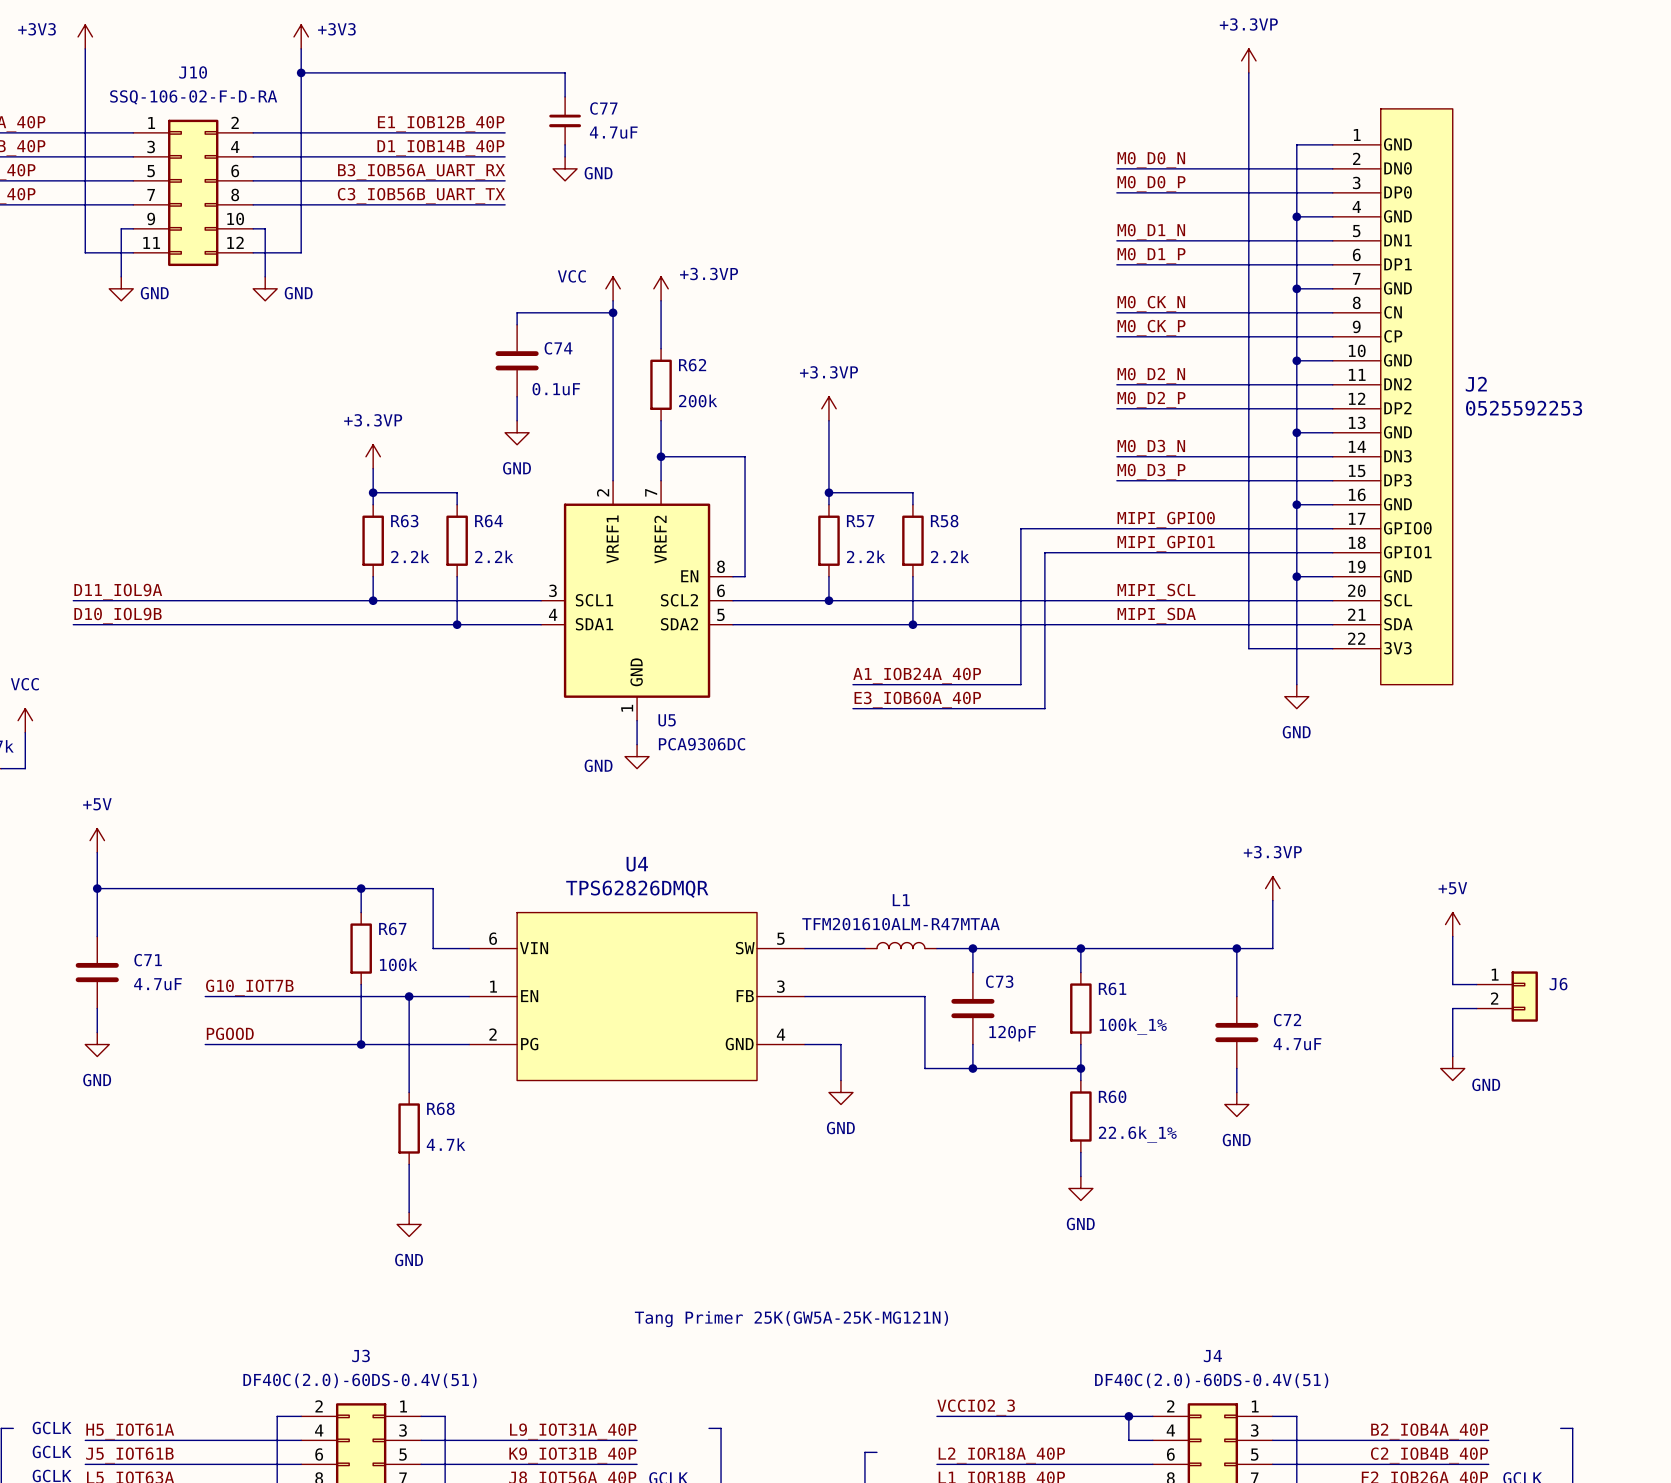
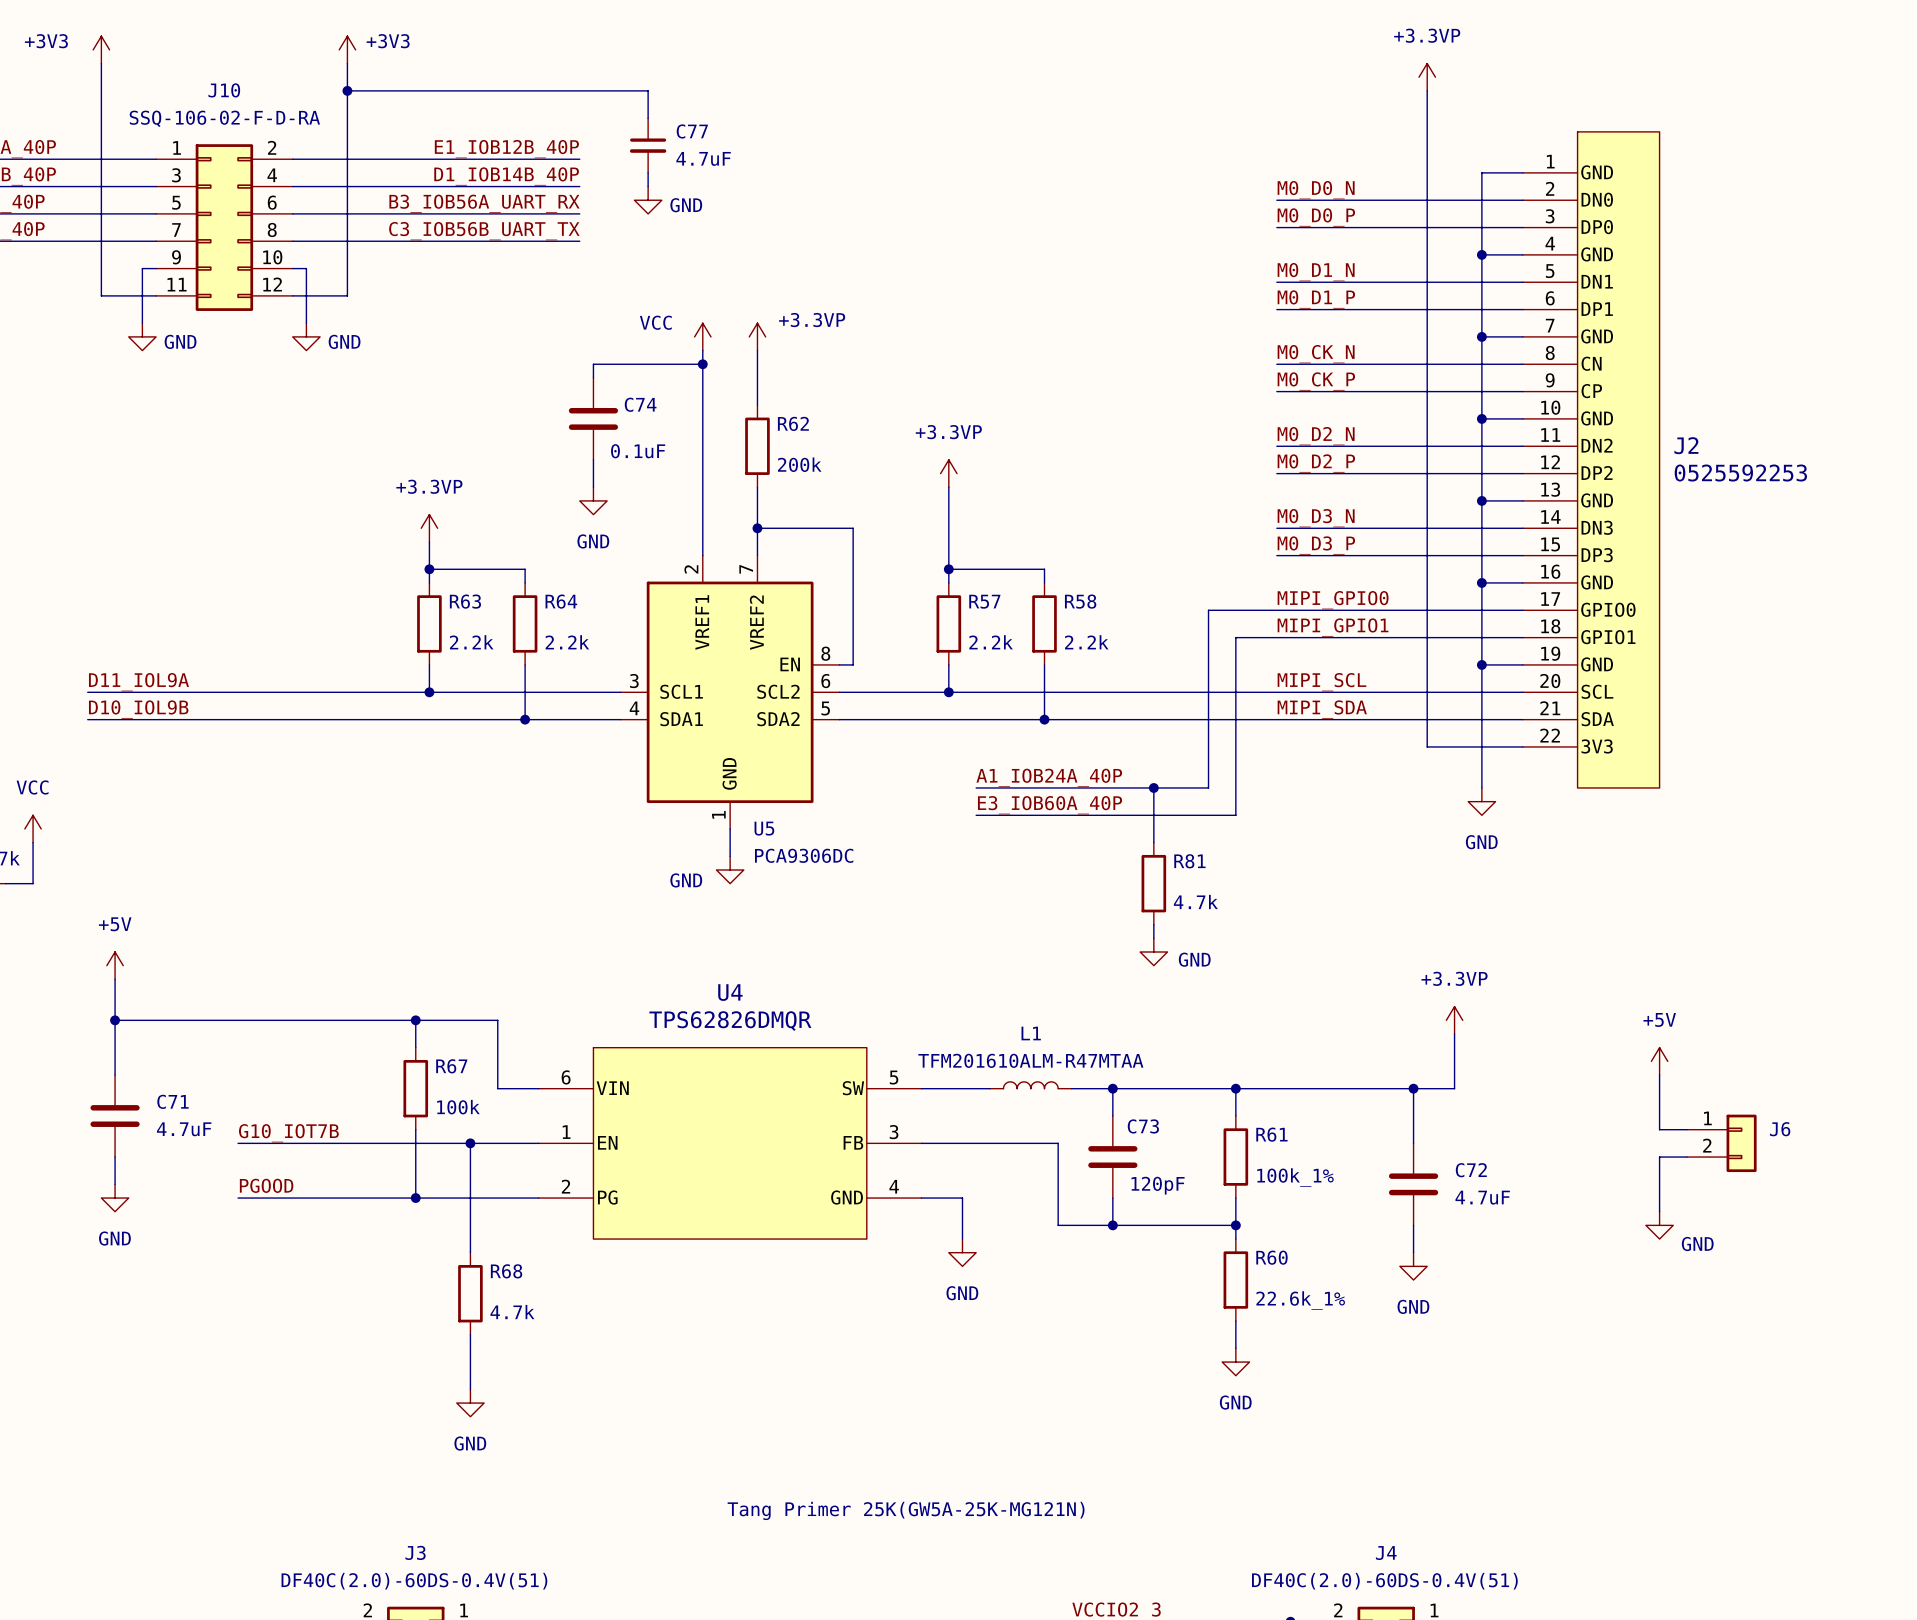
wire: (1056, 528) (1020, 528) (1020, 684) -> (1208, 610) (1208, 787) (1167, 787)
wire: (1080, 552) (1044, 552) (1044, 708) -> (1235, 637) (1235, 815) (1194, 815)
wire: none -> (1153, 787) (1153, 842)
junction: none -> (1153, 787)
R81: none -> 4.7k (1153, 883)
wire: none -> (1153, 924) (1153, 938)
power symbol: none -> GND (1153, 952)

